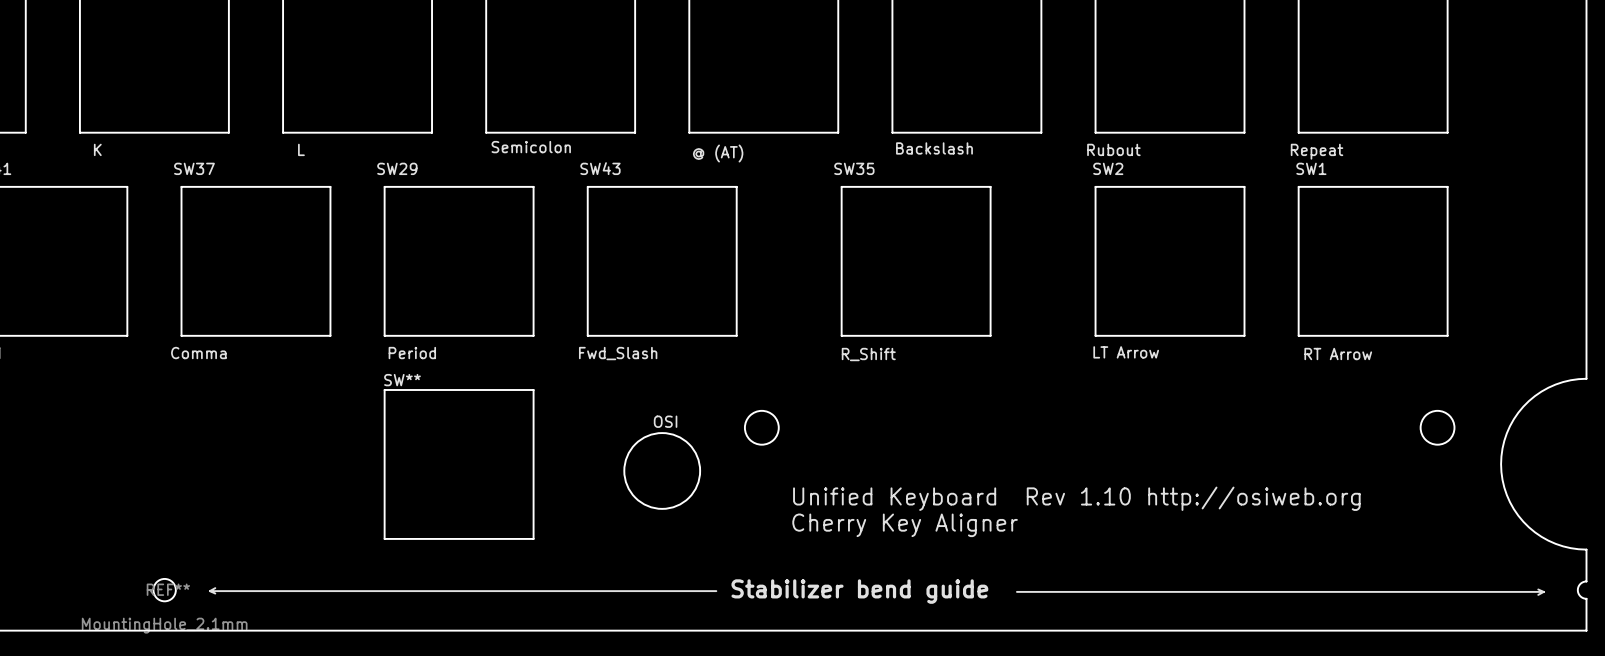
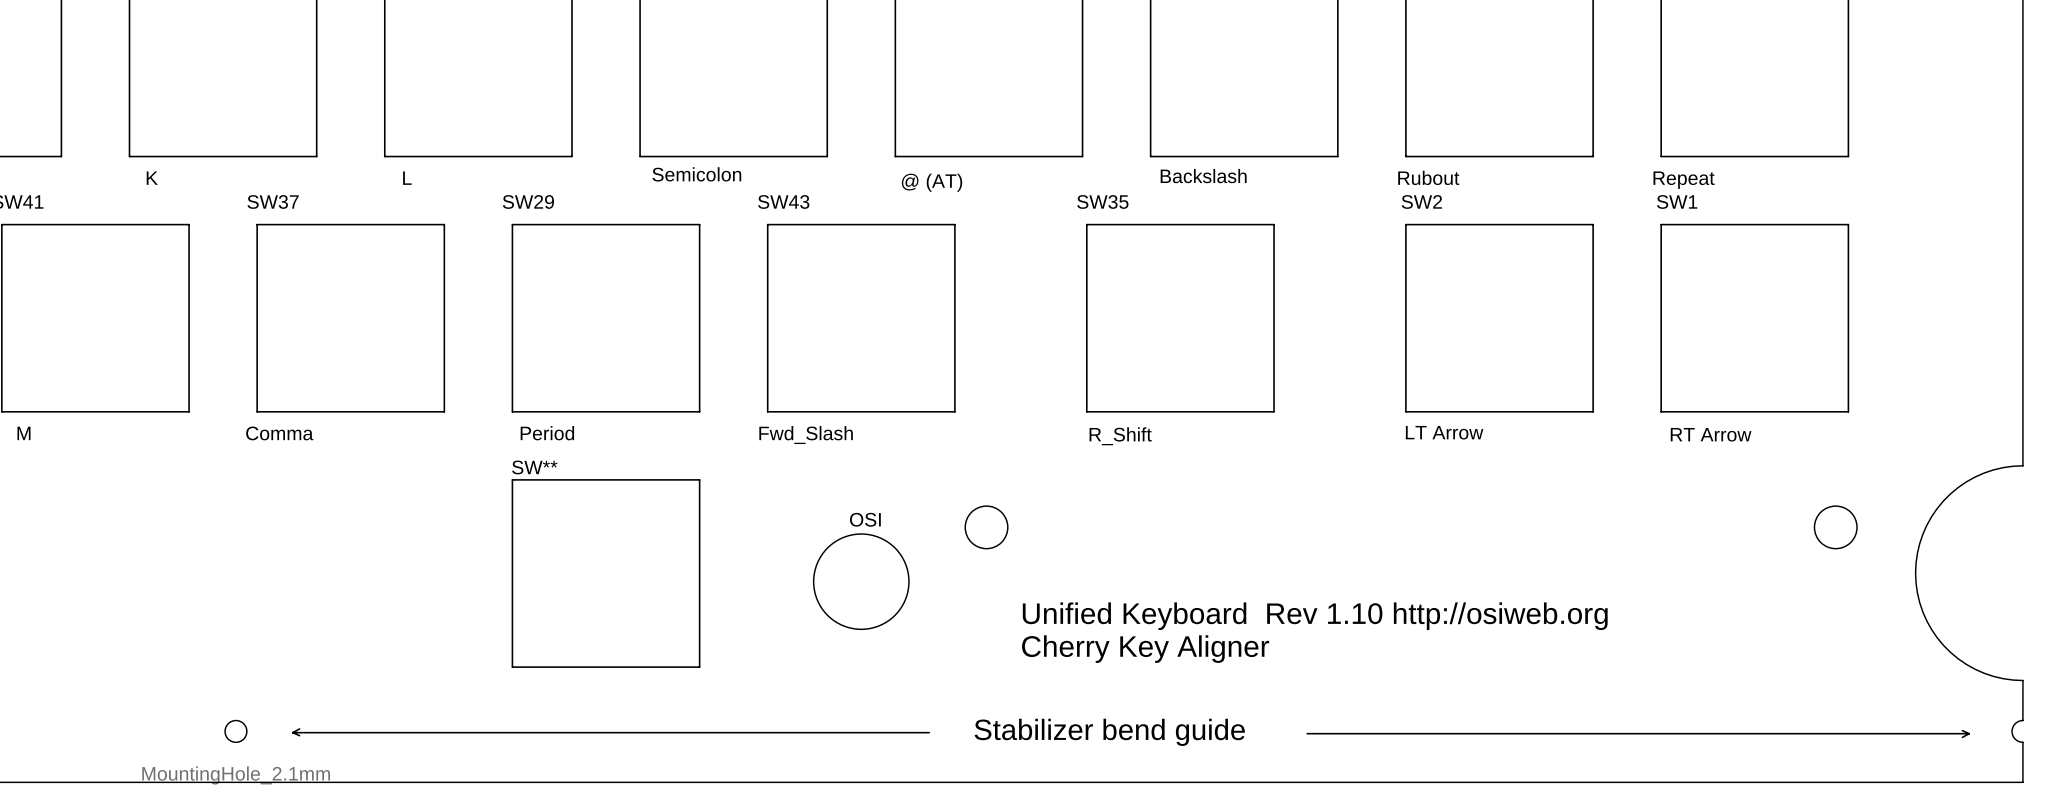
REF**: MountingHole_2.1mm (164, 590) -> none
part: none -> MountingHole_2.1mm (235, 731)

